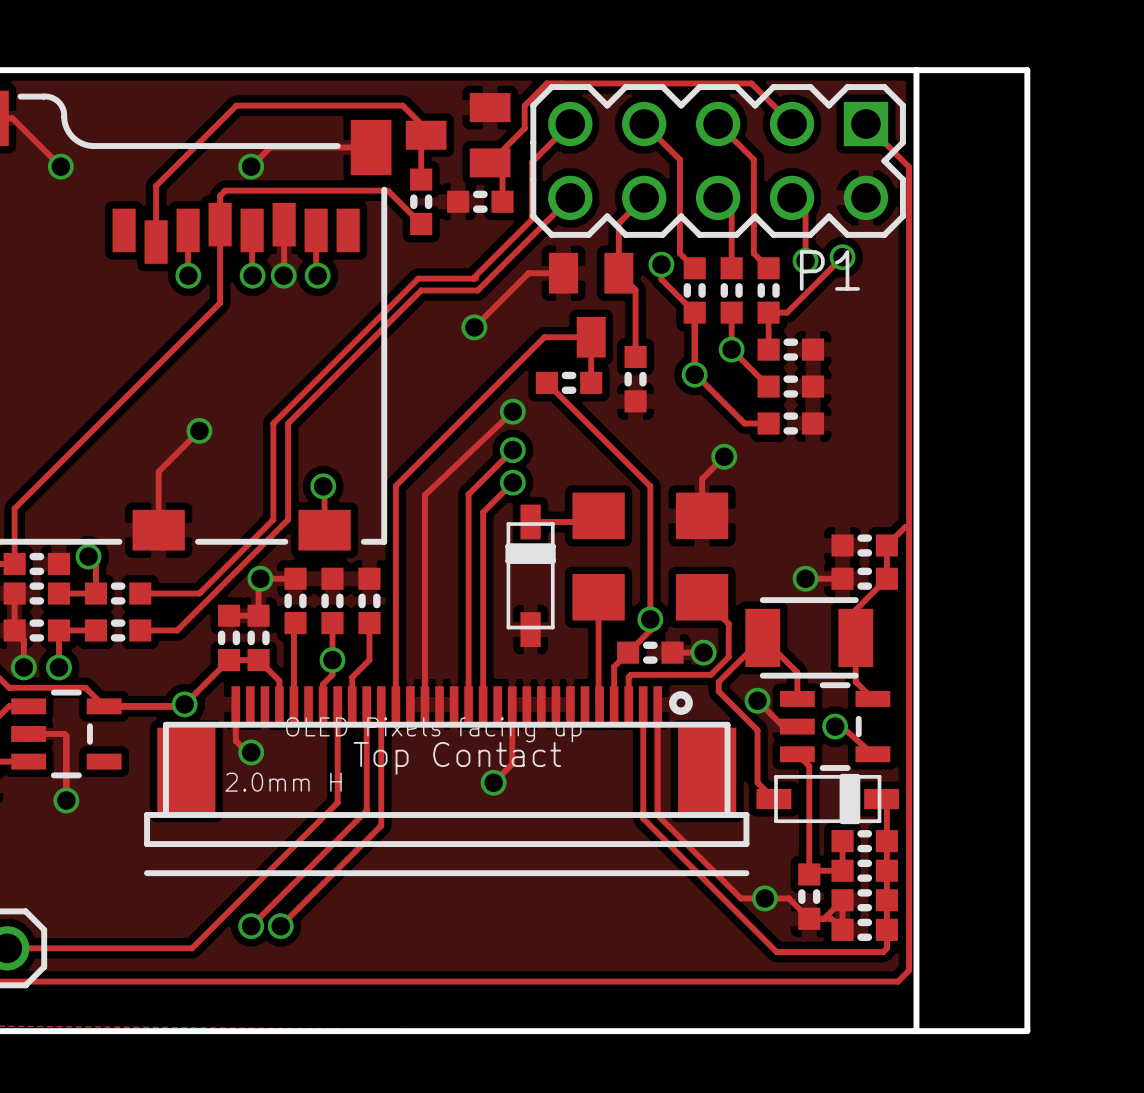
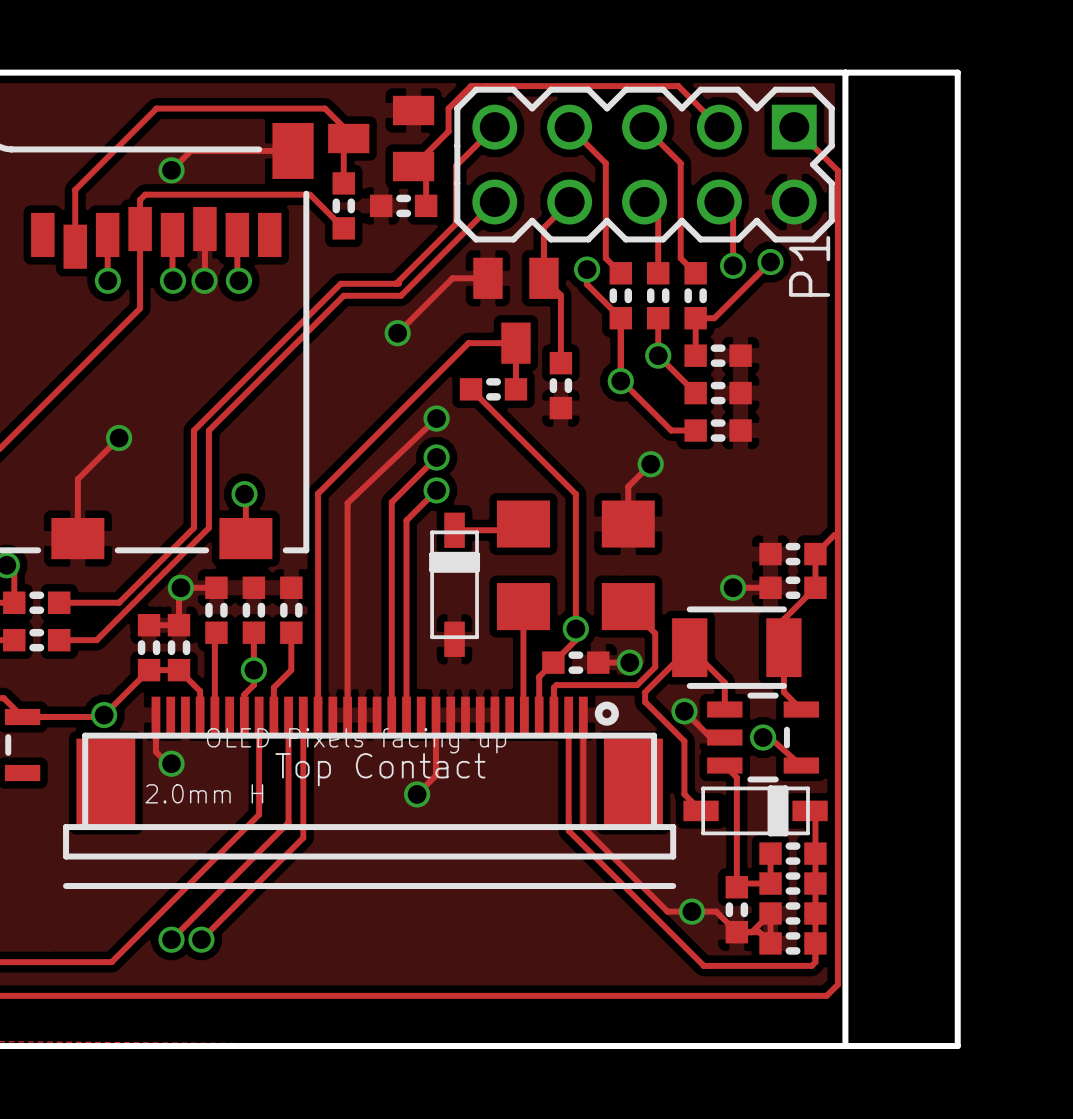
P1 name rotation: 0° (829, 270) -> 90° counterclockwise (809, 266)

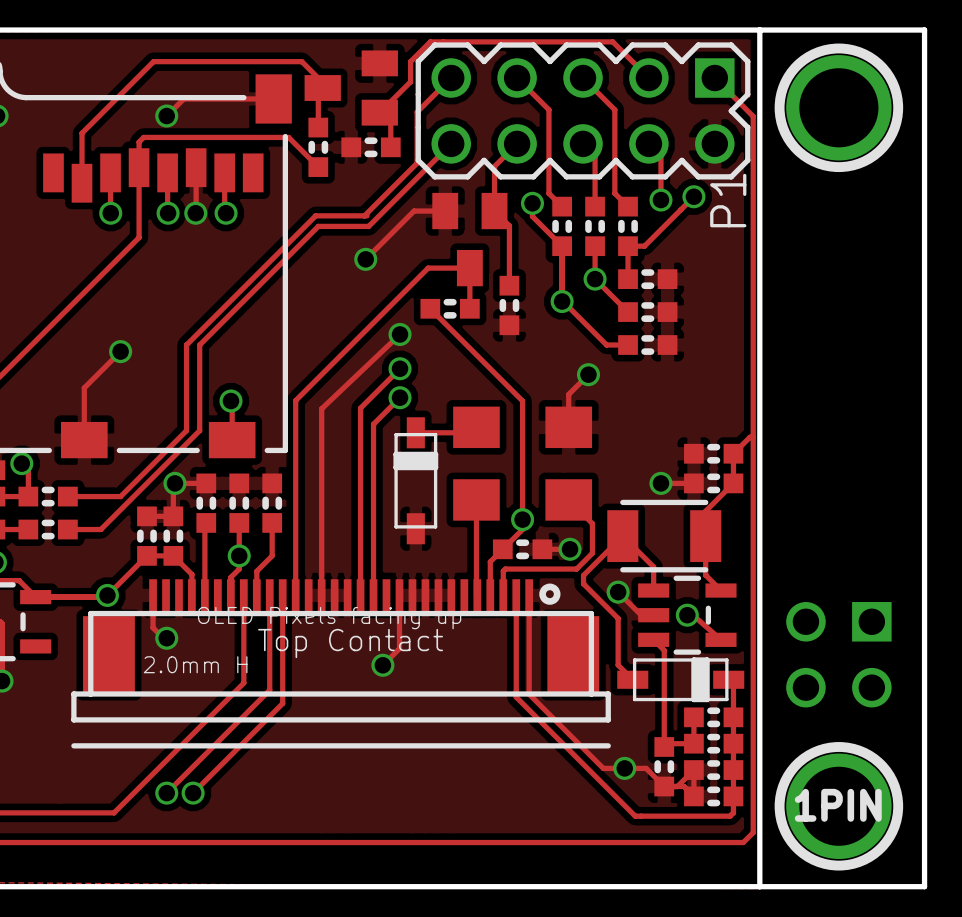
board edge: (957, 72) (957, 1046) -> (858, 30) (924, 30) (924, 886) (858, 886)
part: none -> (838, 107)
part: none -> (838, 654)
1PIN: none -> (838, 806)

